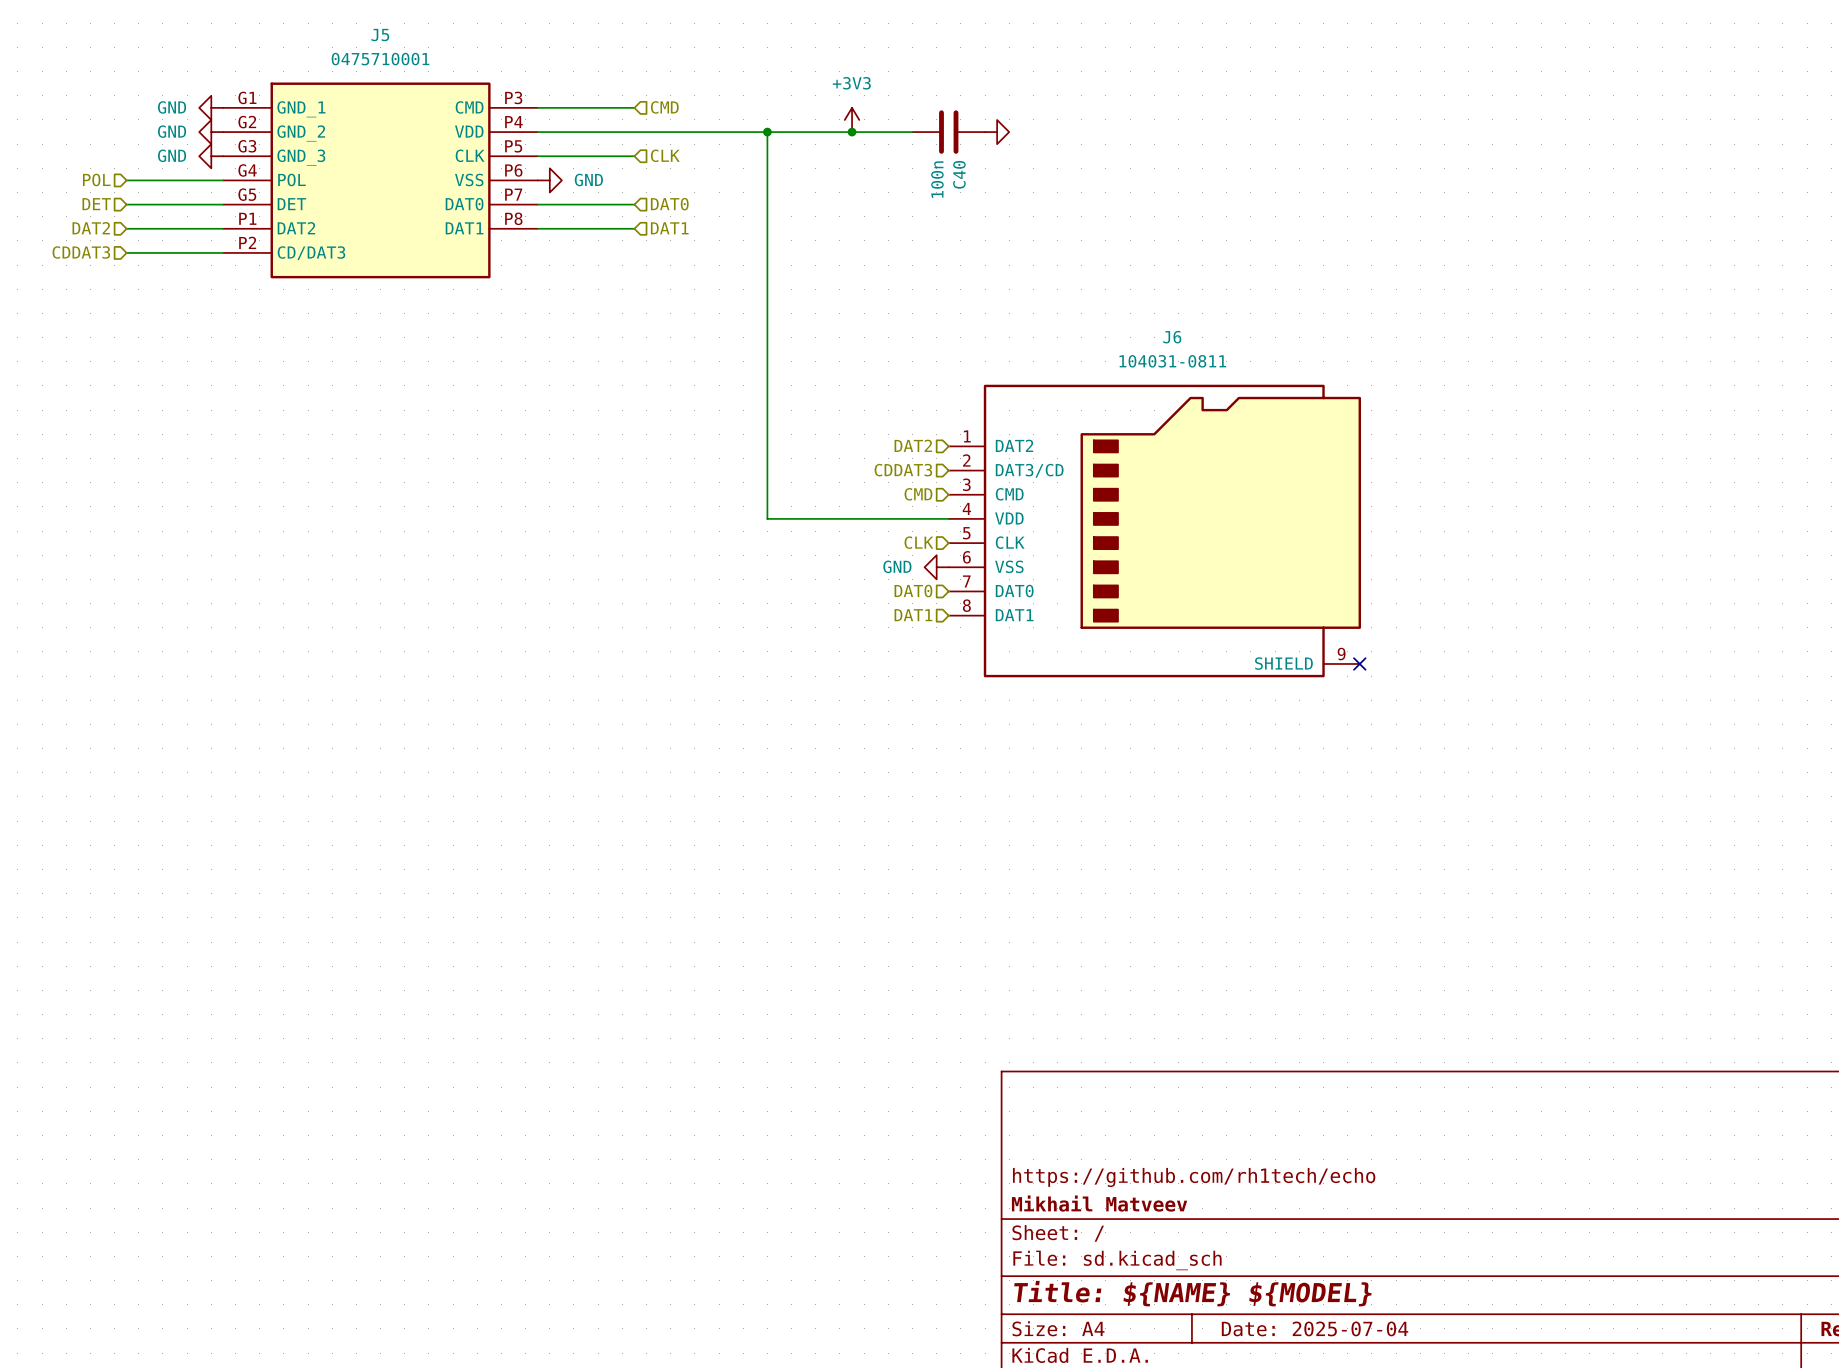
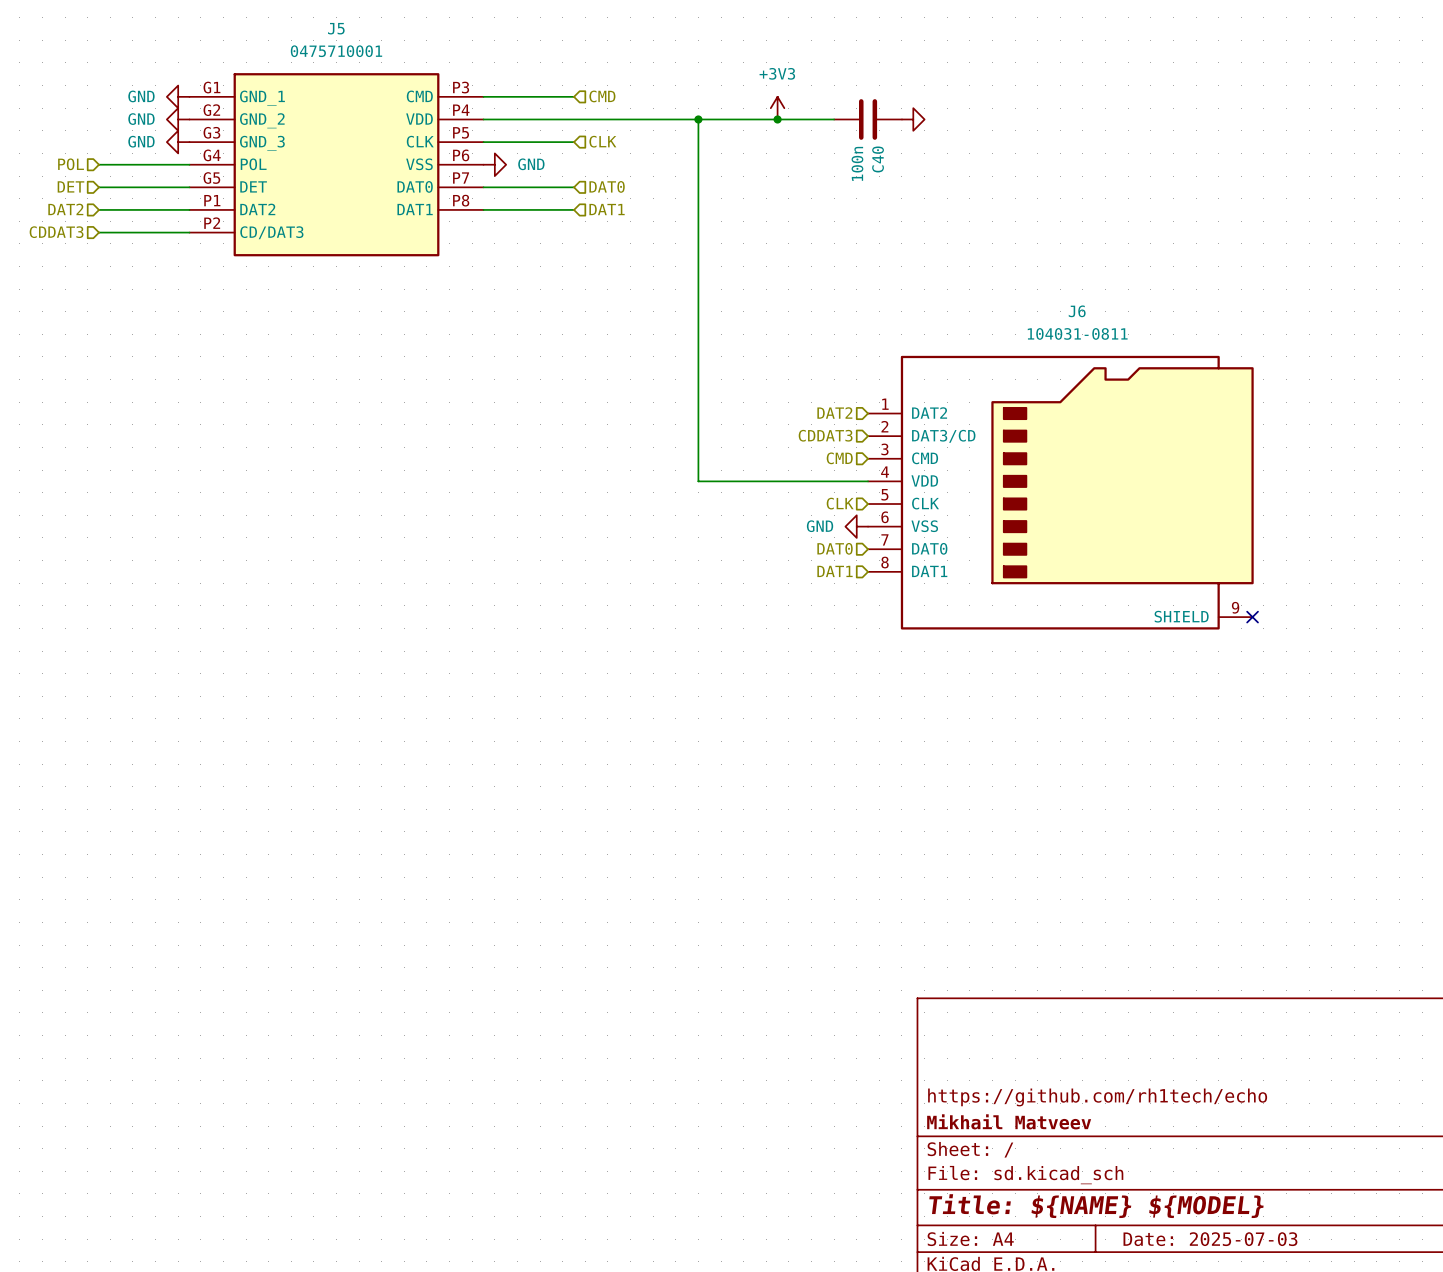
title block: Date: 2025-07-04 (1315, 1328) -> Date: 2025-07-03 (1210, 1239)

